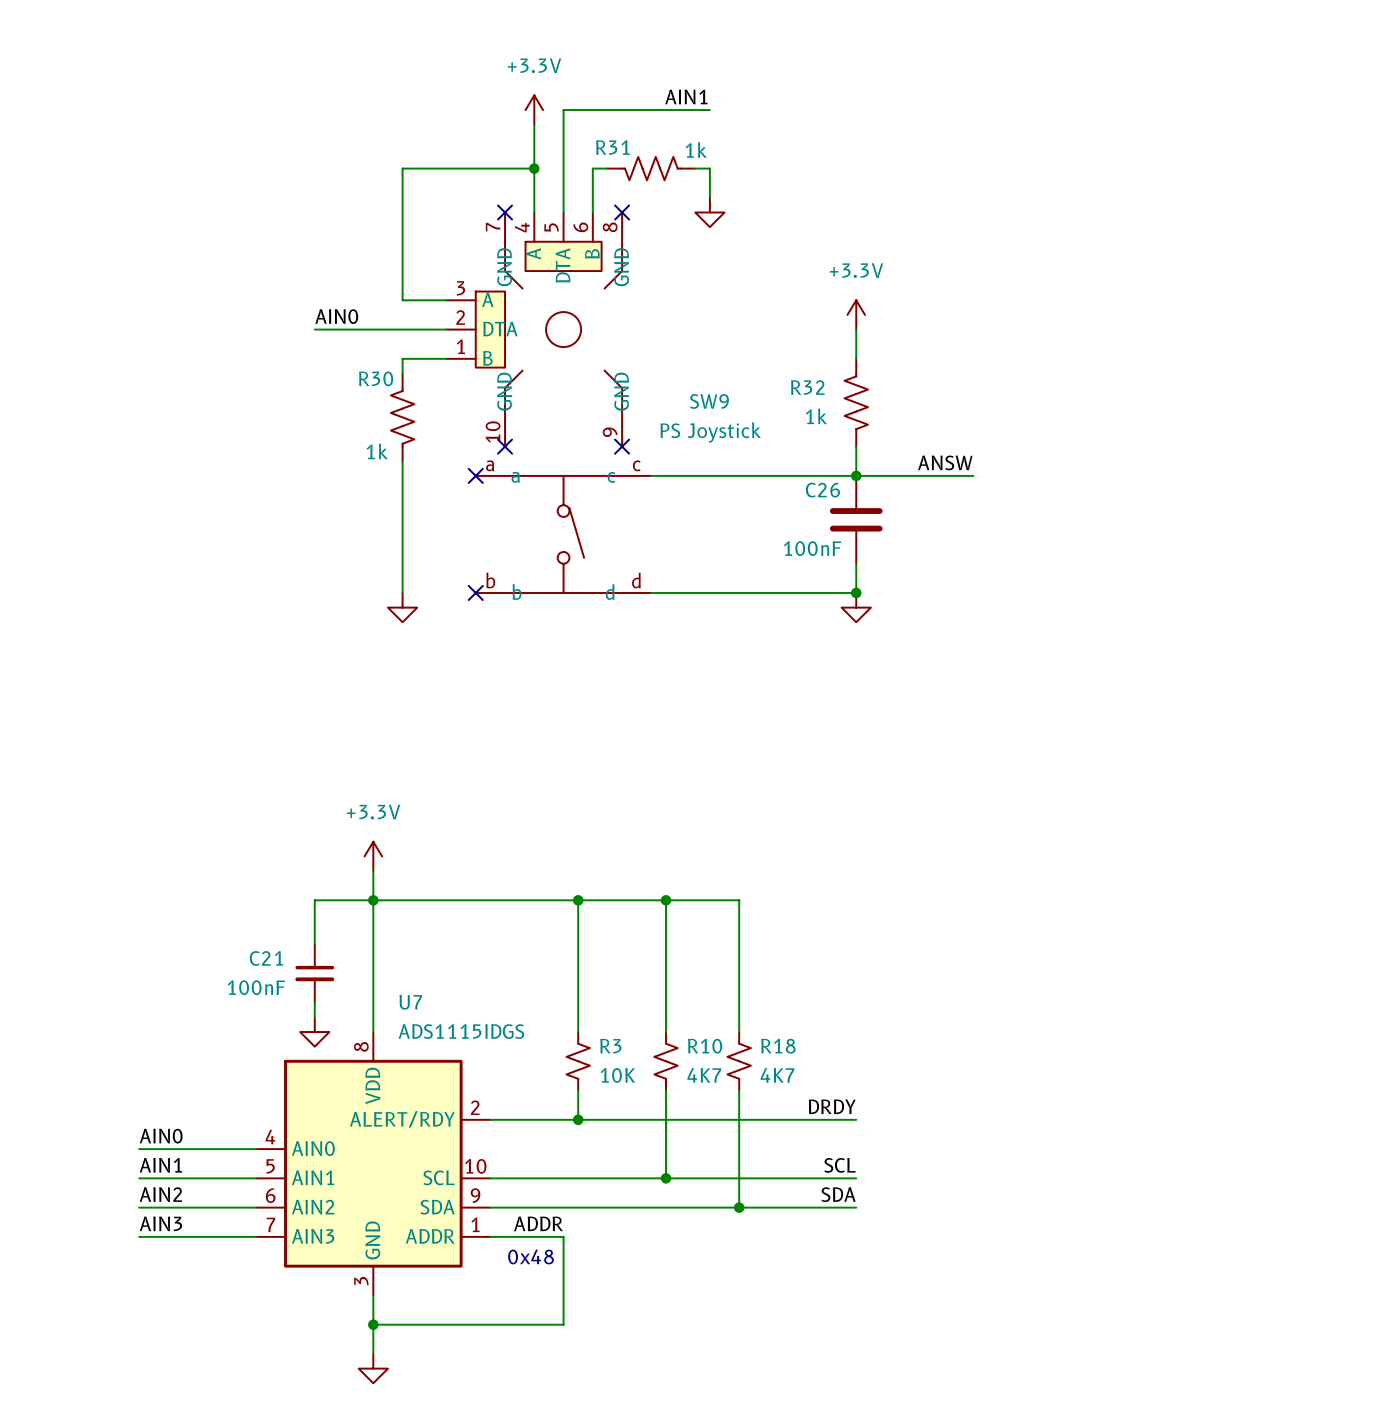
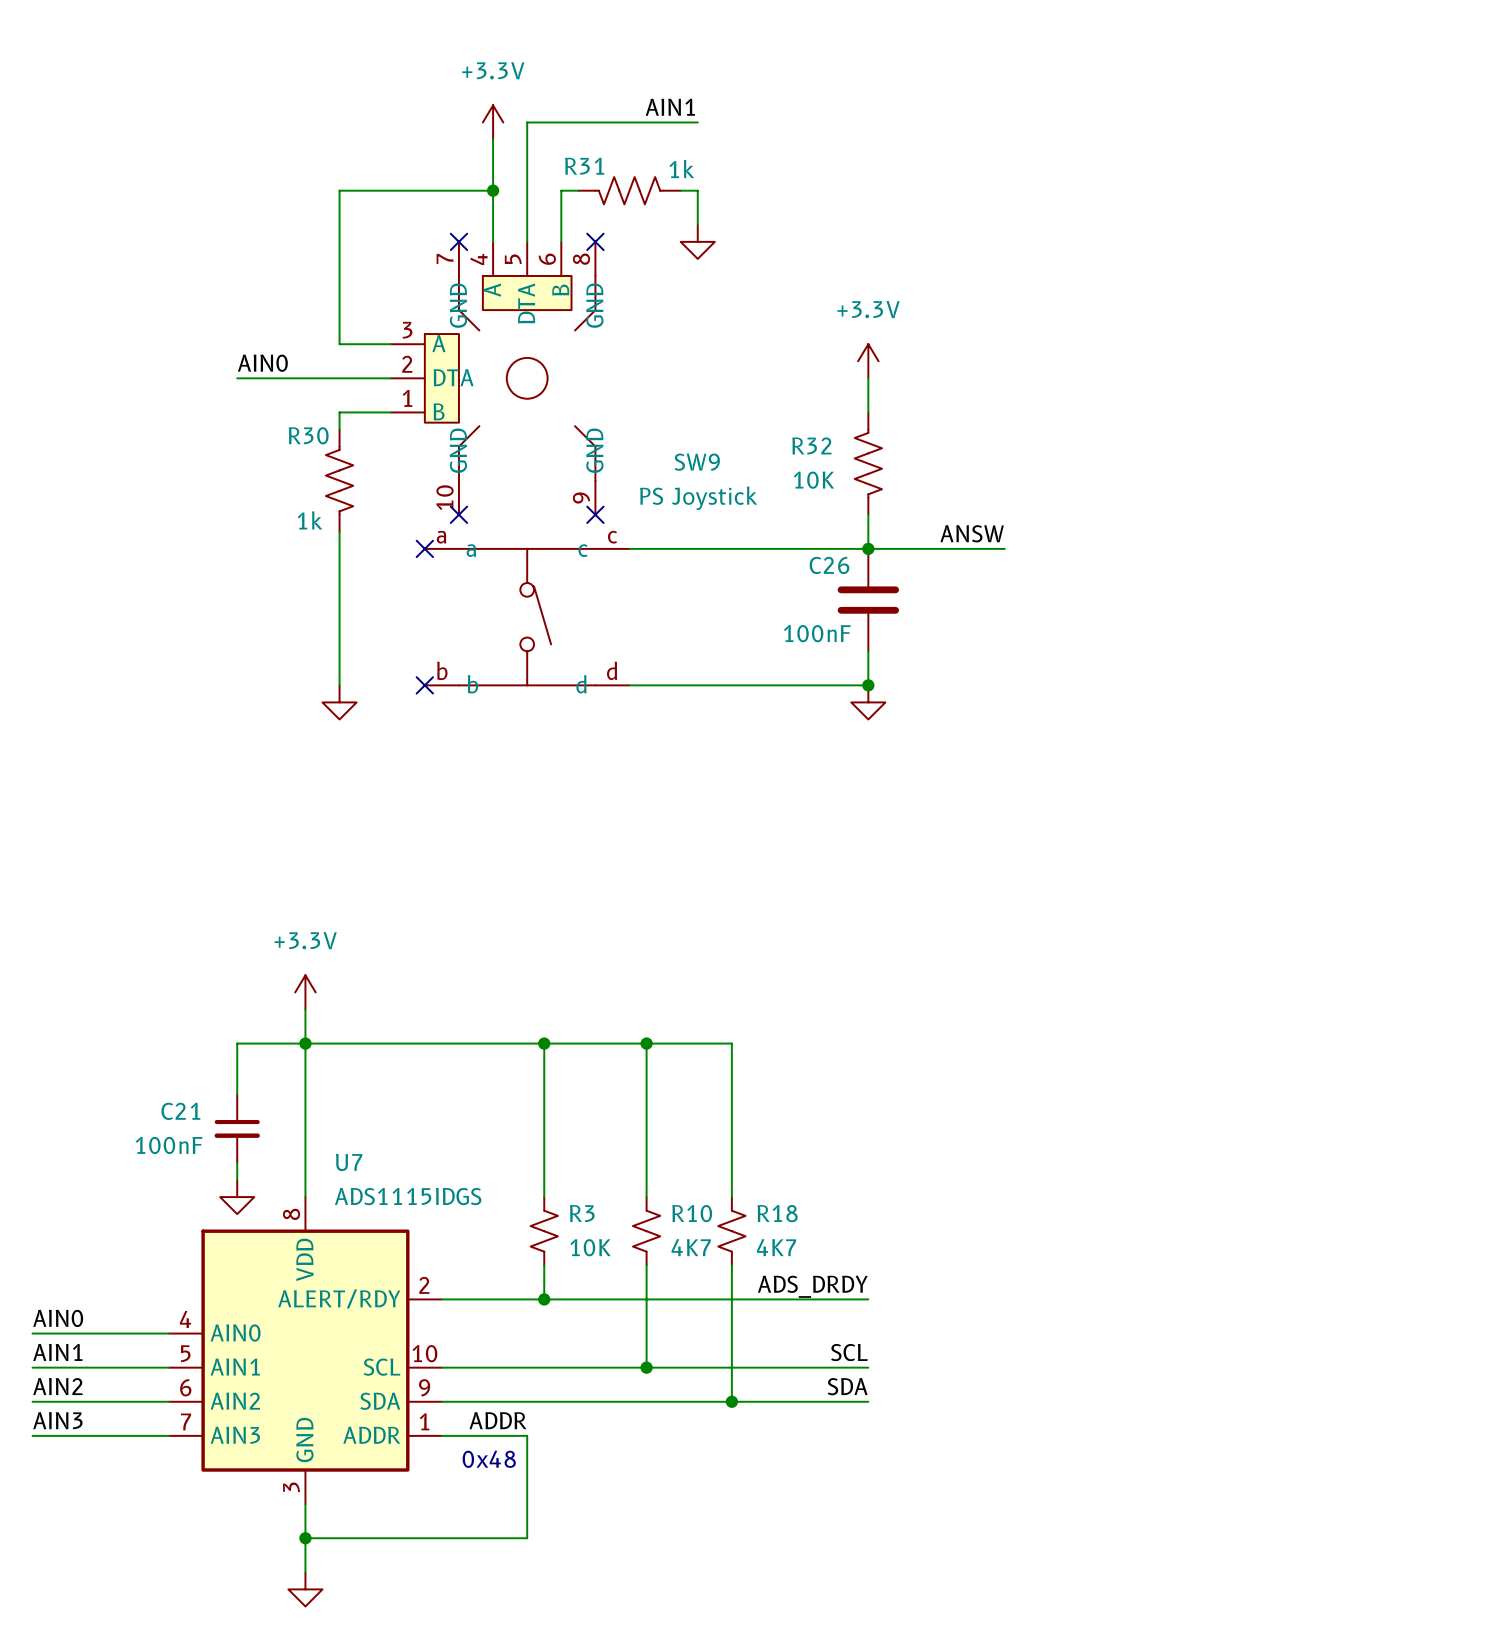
R32 value: 1k (816, 416) -> 10K (813, 480)
label: DRDY (832, 1106) -> ADS_DRDY (812, 1286)

